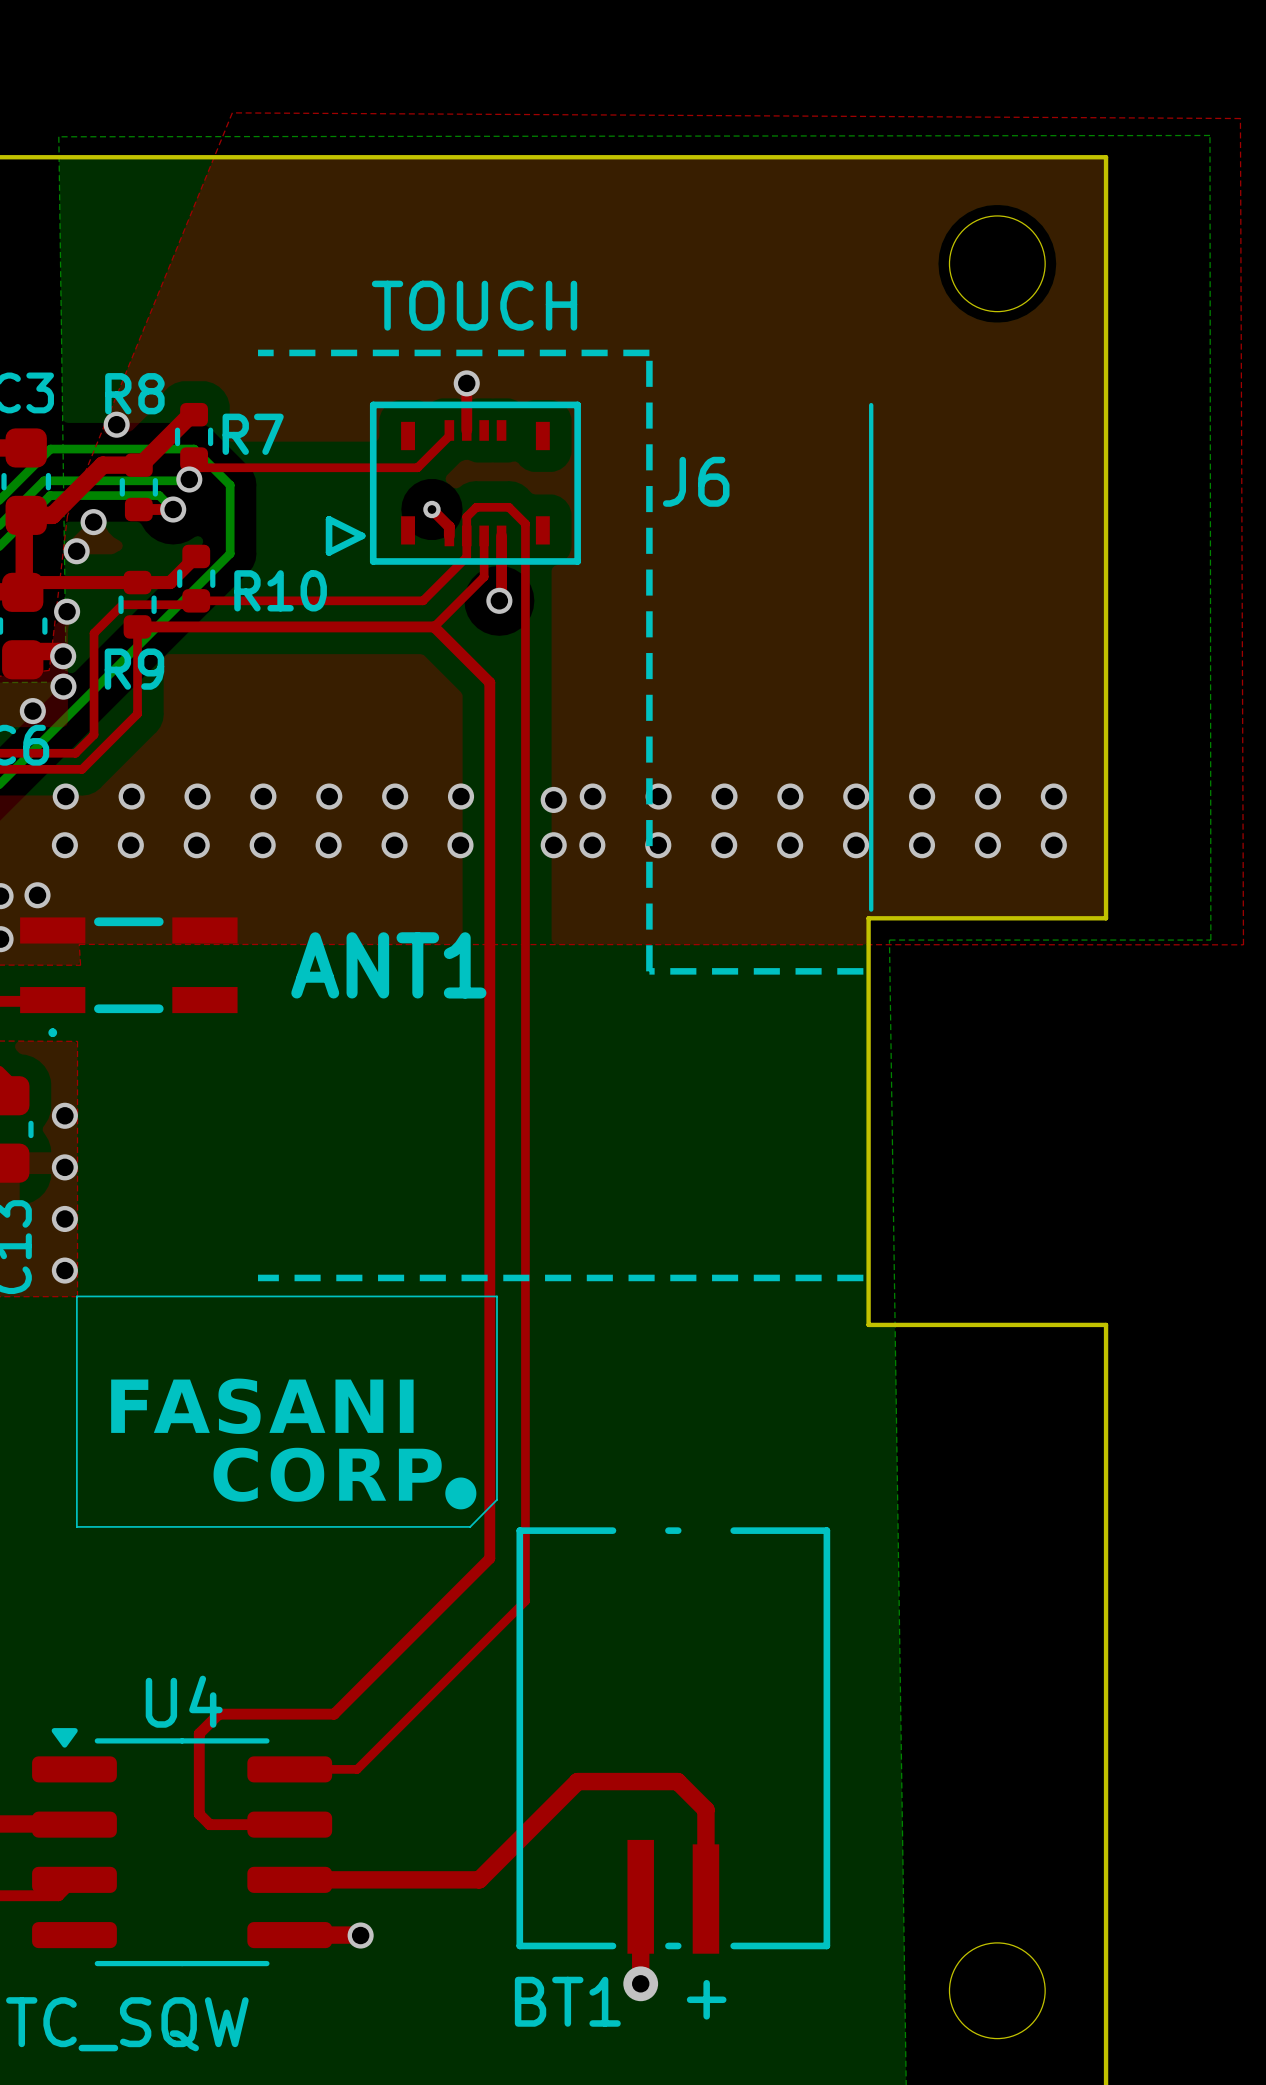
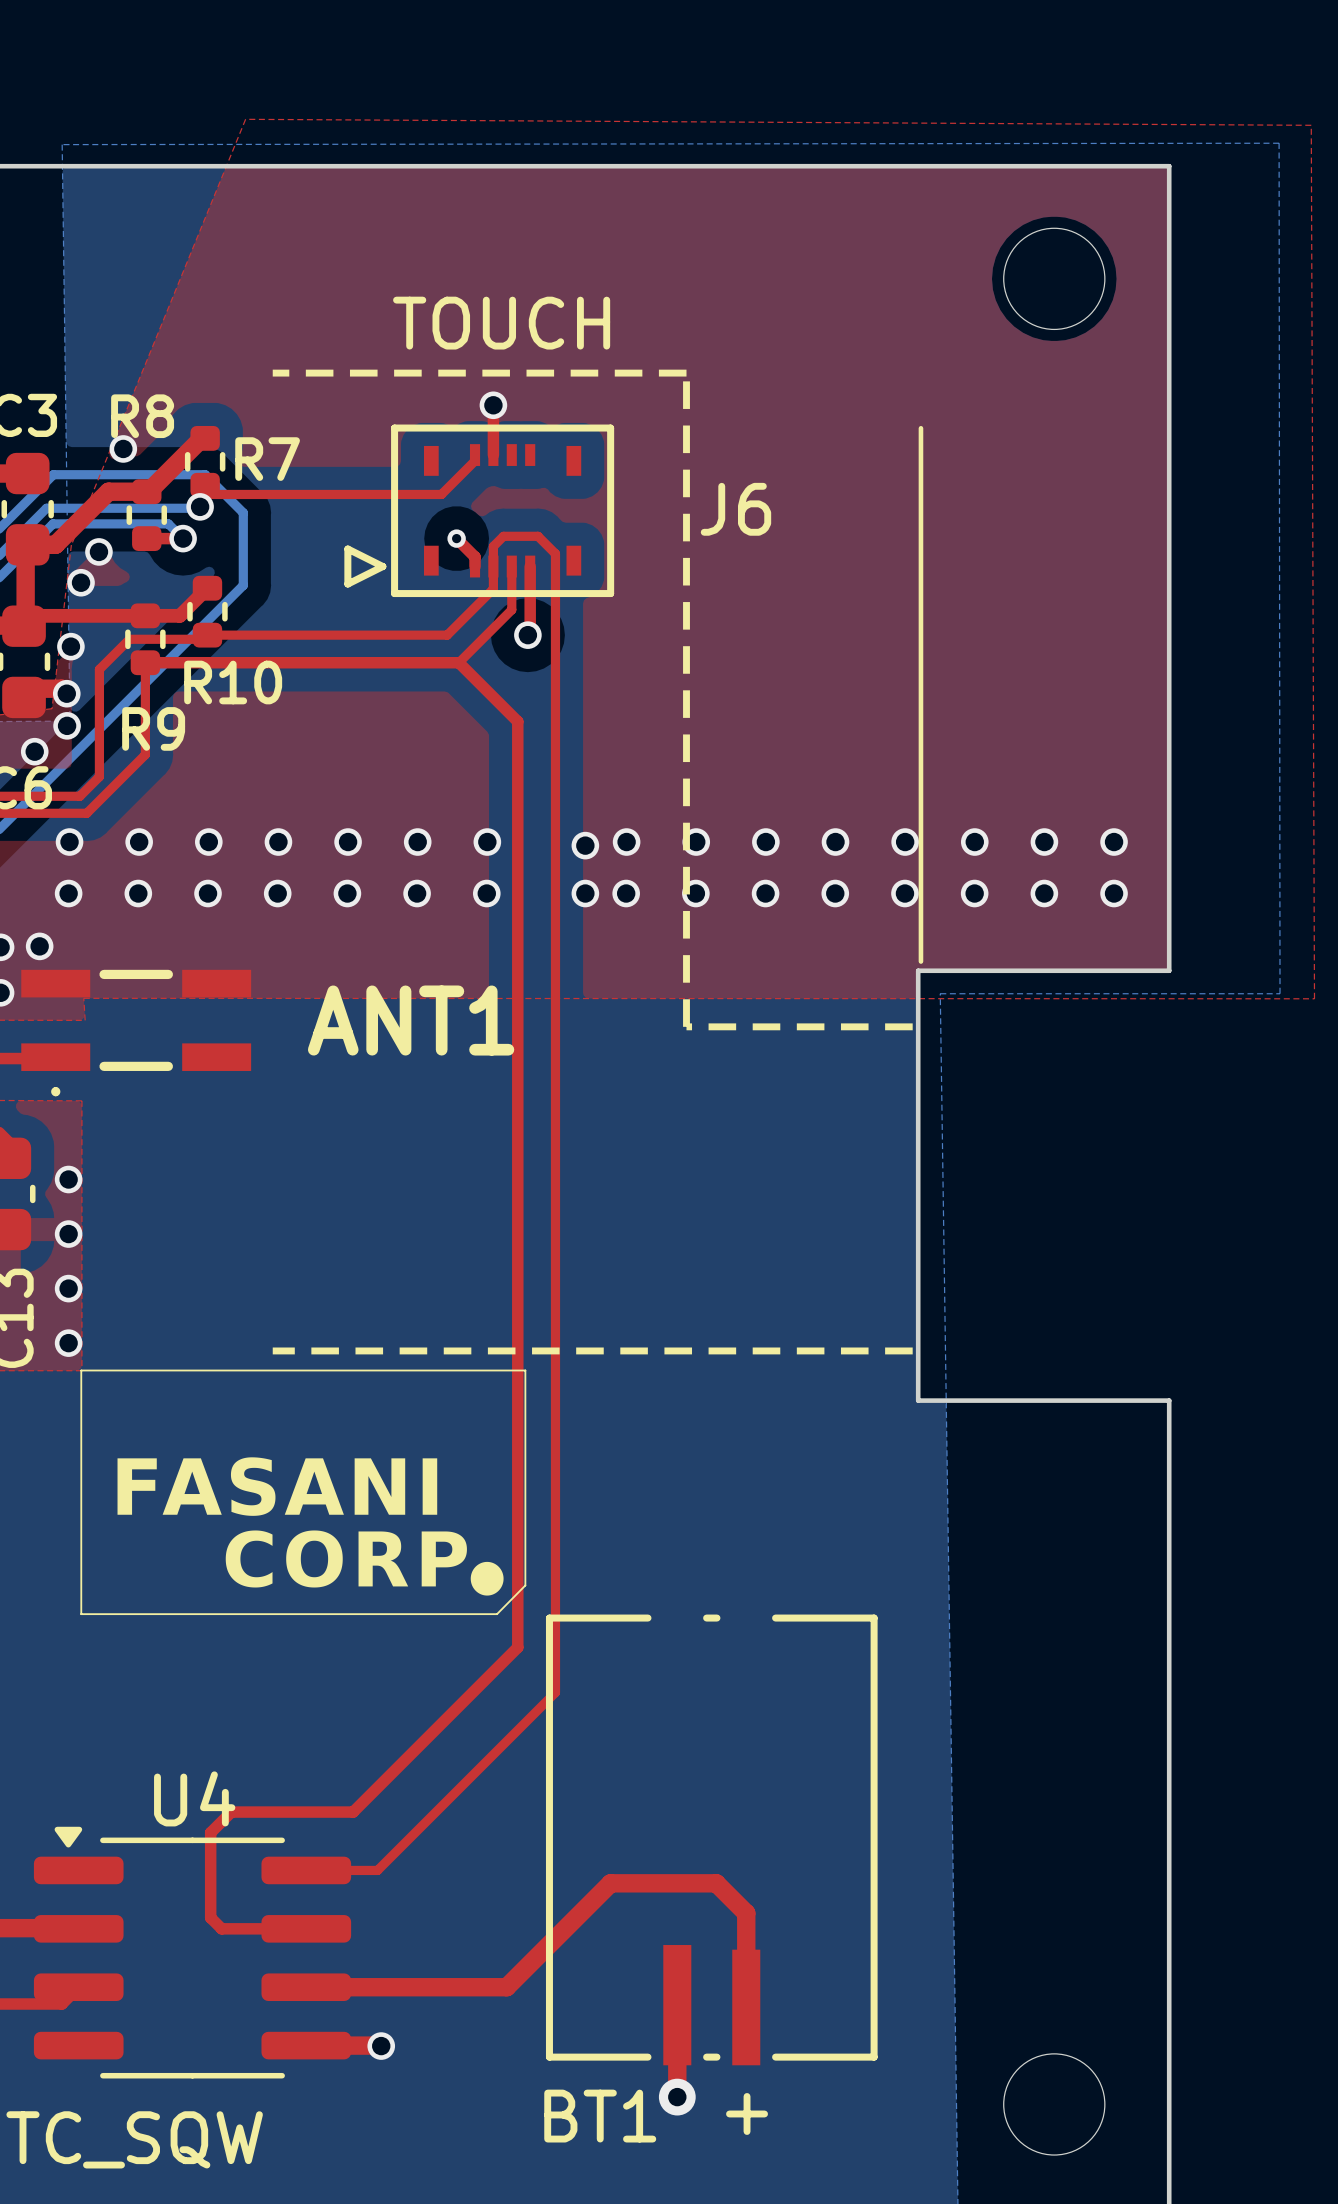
R10 name: R10 (280, 590) -> R9 (153, 728)
R9 name: R9 (134, 669) -> R10 (233, 682)

